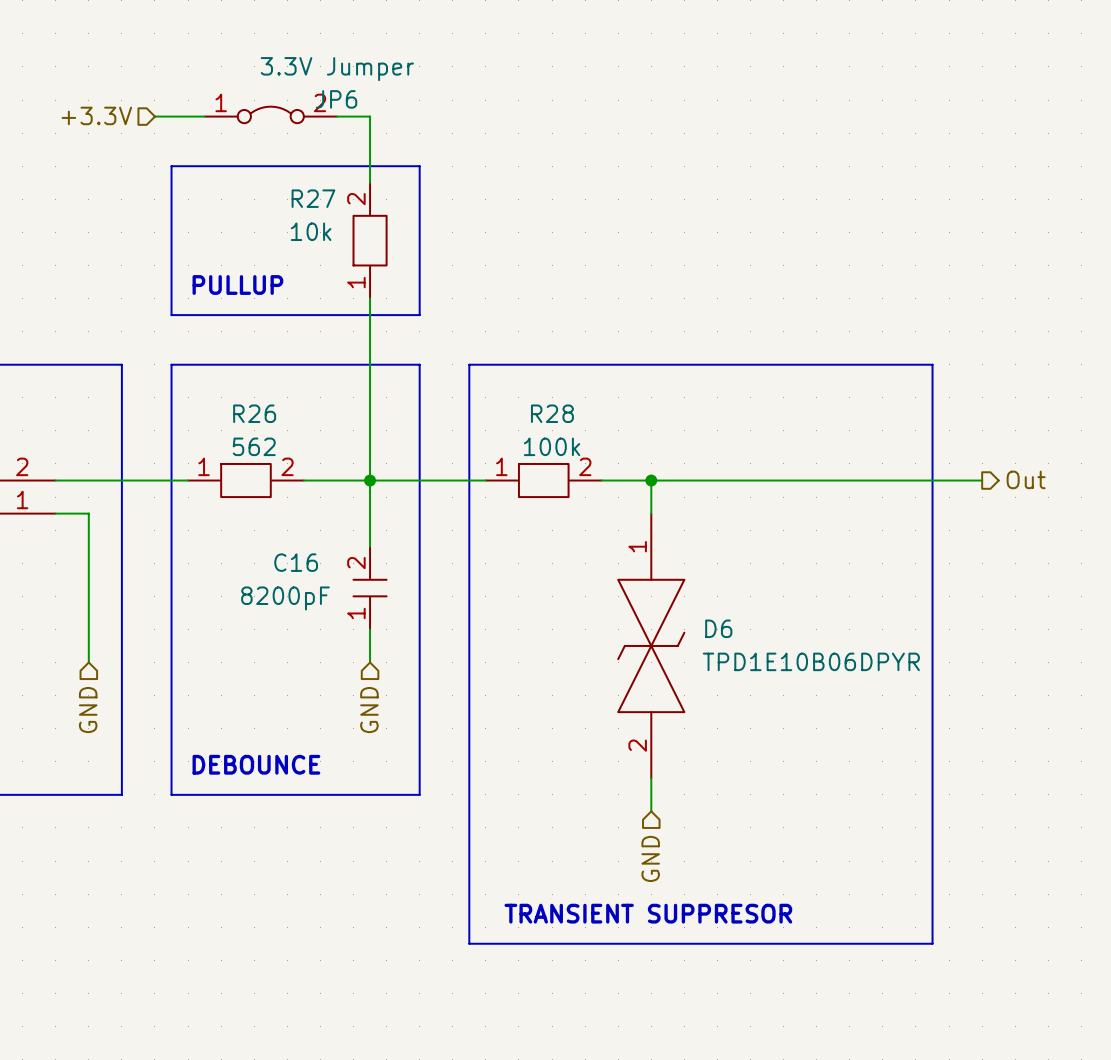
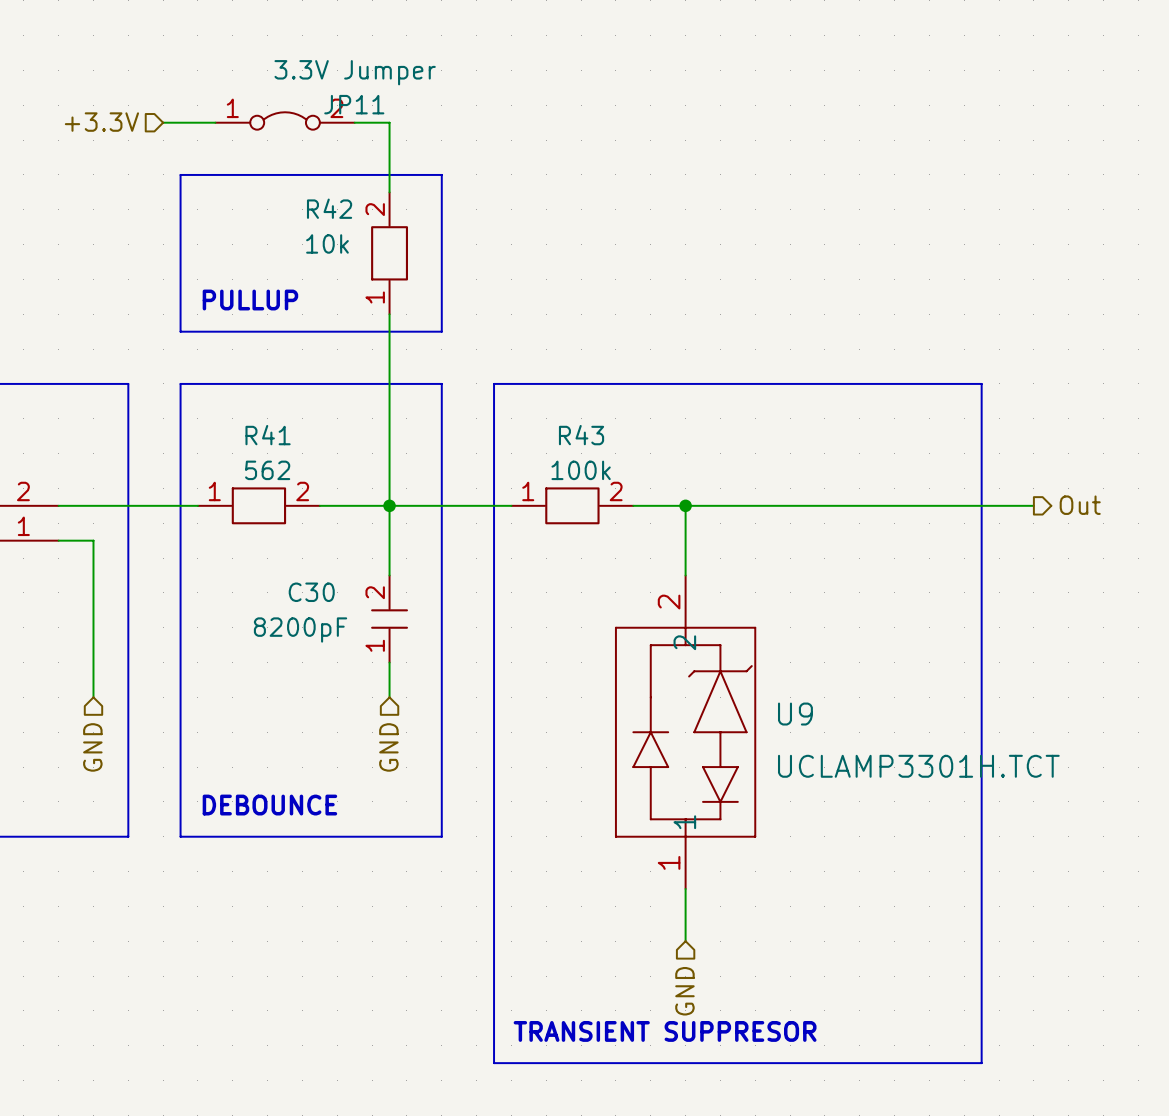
JP6 name: JP6 (336, 99) -> JP11 (354, 104)
R27 name: R27 (313, 198) -> R42 (329, 208)
R26 name: R26 (254, 413) -> R41 (268, 435)
R28 name: R28 (552, 413) -> R43 (581, 435)
C16 name: C16 (296, 562) -> C30 (311, 592)
D6: TPD1E10B06DPYR (651, 645) -> none
U9: none -> UCLAMP3301H.TCT (685, 732)
wire: none -> (685, 888) (685, 941)
hierarchical label position: GND (650, 858) -> GND (684, 991)
text position: TRANSIENT SUPPRESOR (648, 913) -> TRANSIENT SUPPRESOR (665, 1031)
line: (469, 943) (932, 943) -> (494, 993) (494, 1063) (981, 1063) (981, 993)

